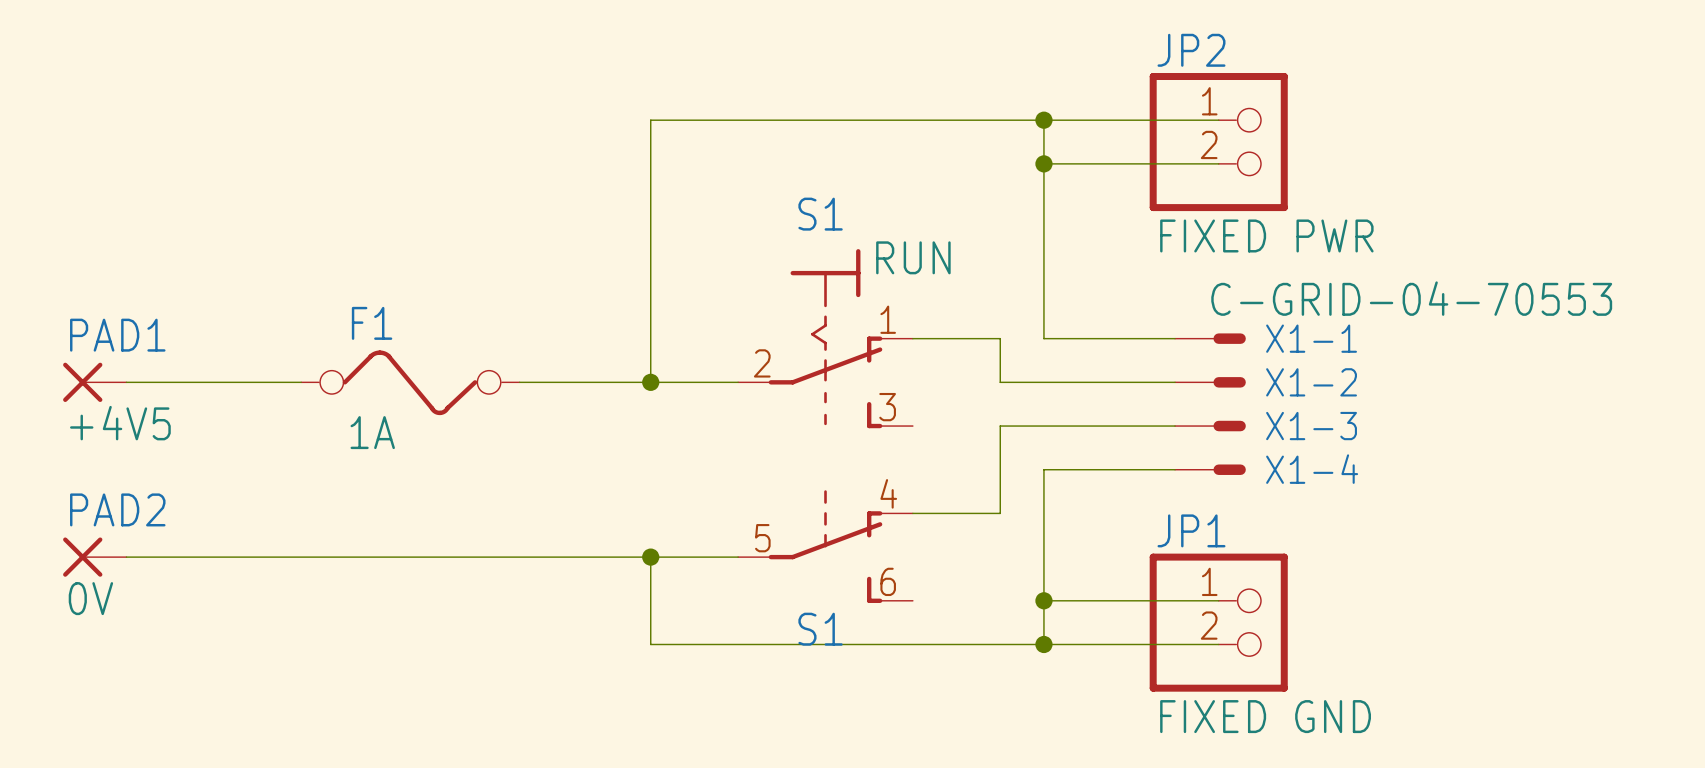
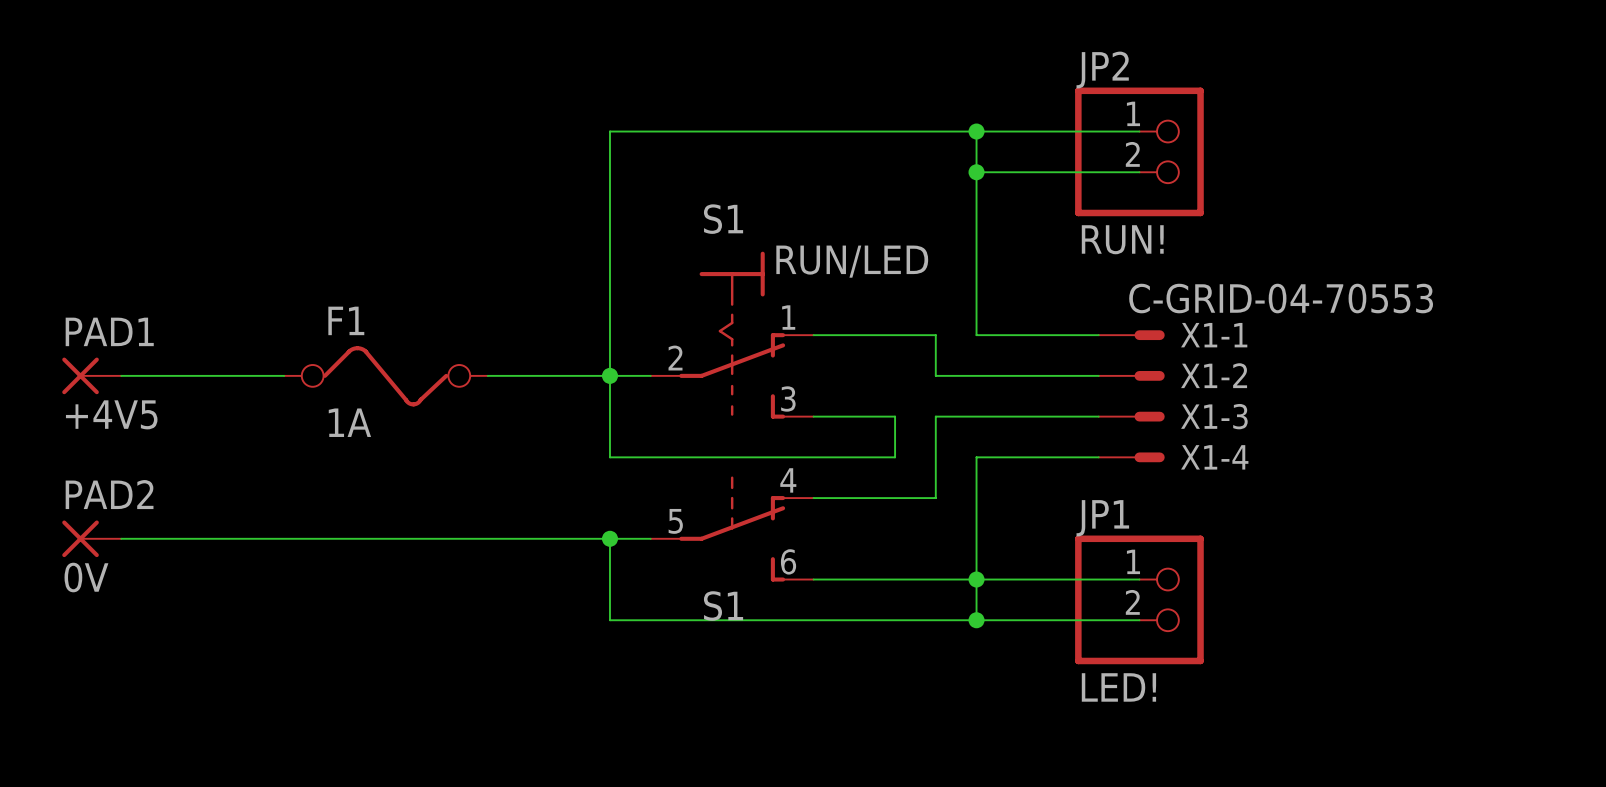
JP2 value: FIXED PWR (1266, 235) -> RUN! (1122, 239)
S1: none -> RUN/LED (732, 335)
S1: RUN (825, 338) -> none
wire: none -> (609, 375) (609, 457) (895, 457) (895, 416) (813, 416)
S1 position: (825, 546) -> (732, 529)
wire: none -> (813, 579) (976, 579)
JP1 value: FIXED GND (1265, 716) -> LED! (1118, 687)

